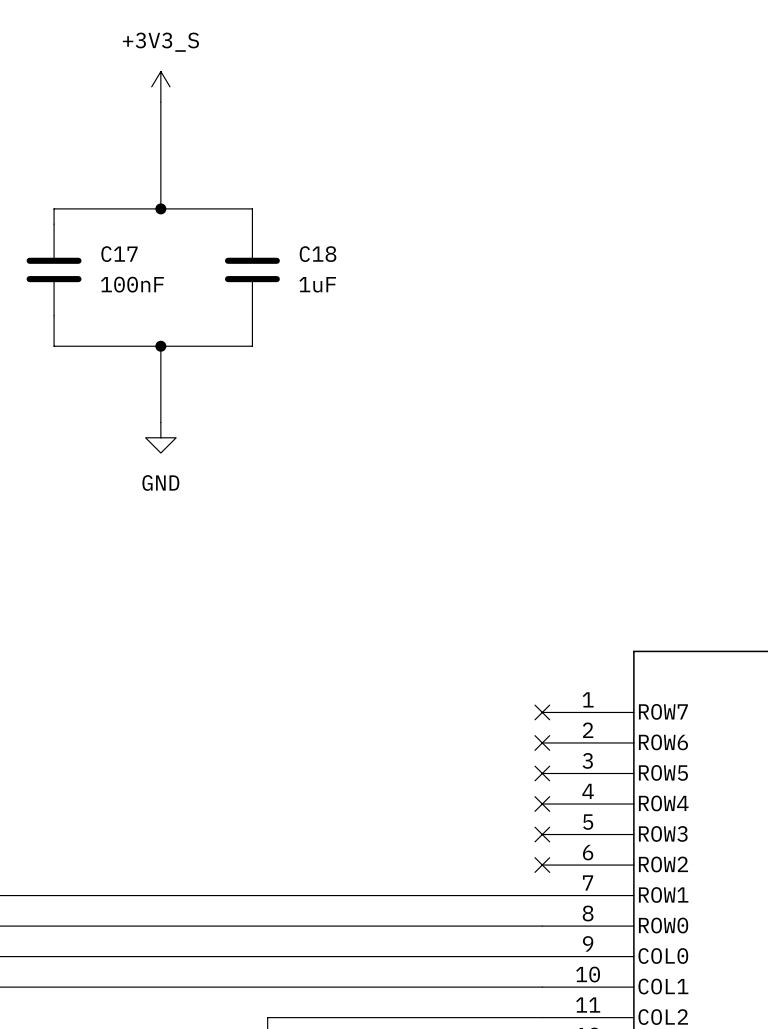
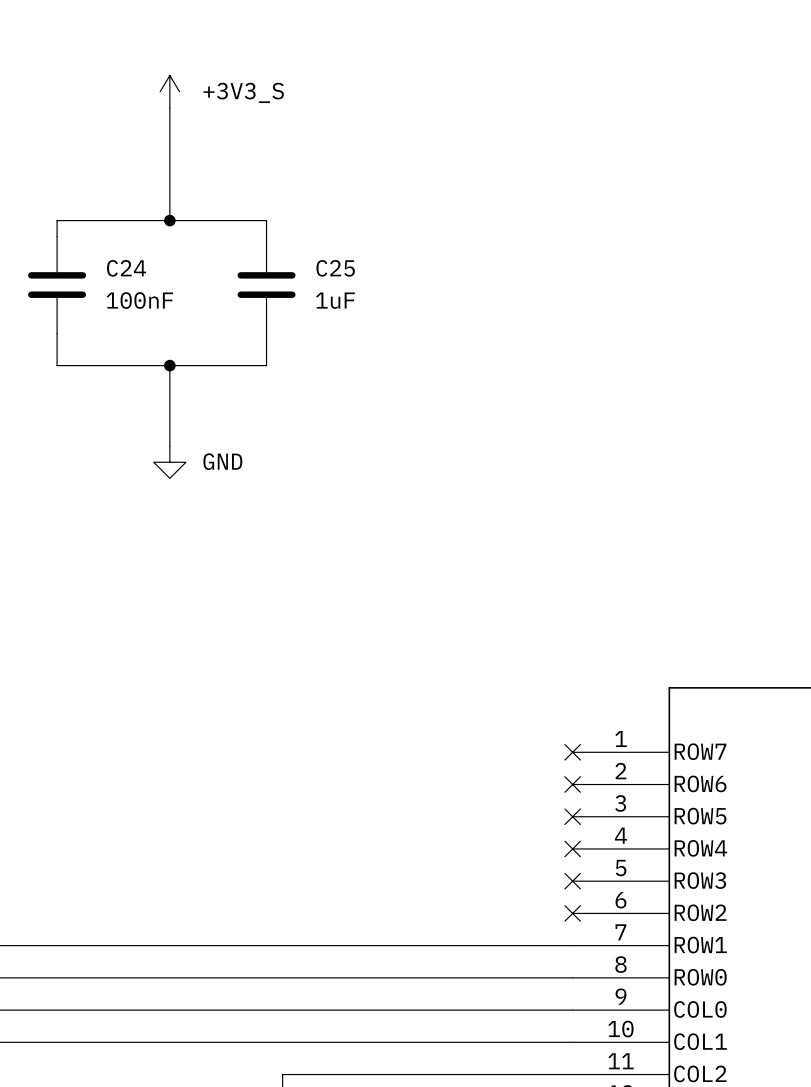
power symbol text position: +3V3_S (160, 42) -> +3V3_S (243, 92)
C17 name: C17 (119, 254) -> C24 (126, 268)
C18 name: C18 (318, 254) -> C25 (335, 268)
power symbol text position: GND (160, 483) -> GND (222, 461)

